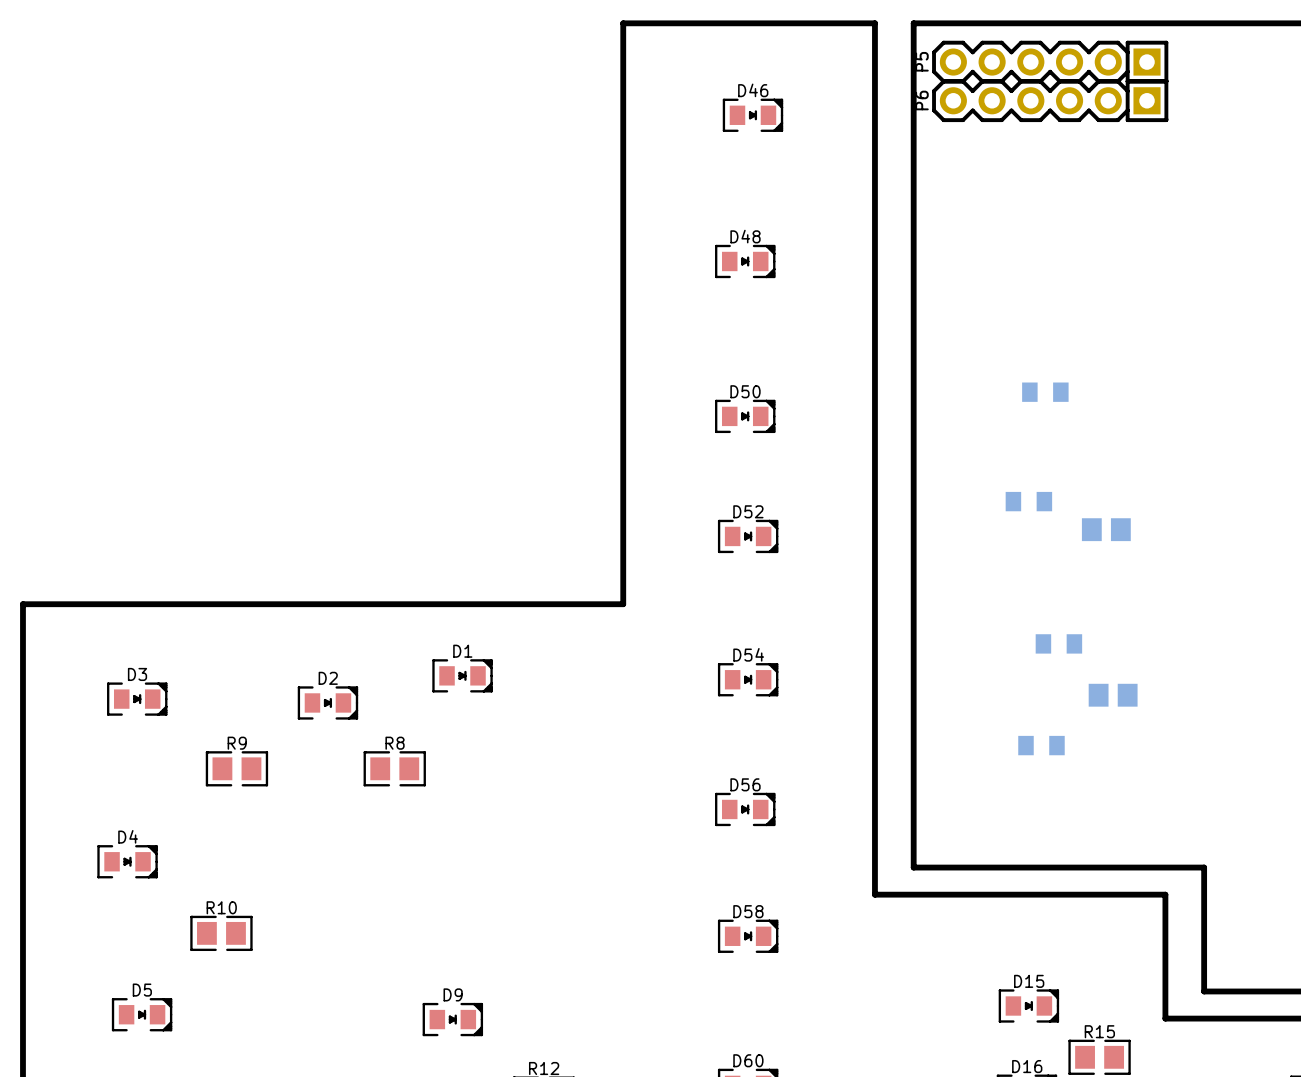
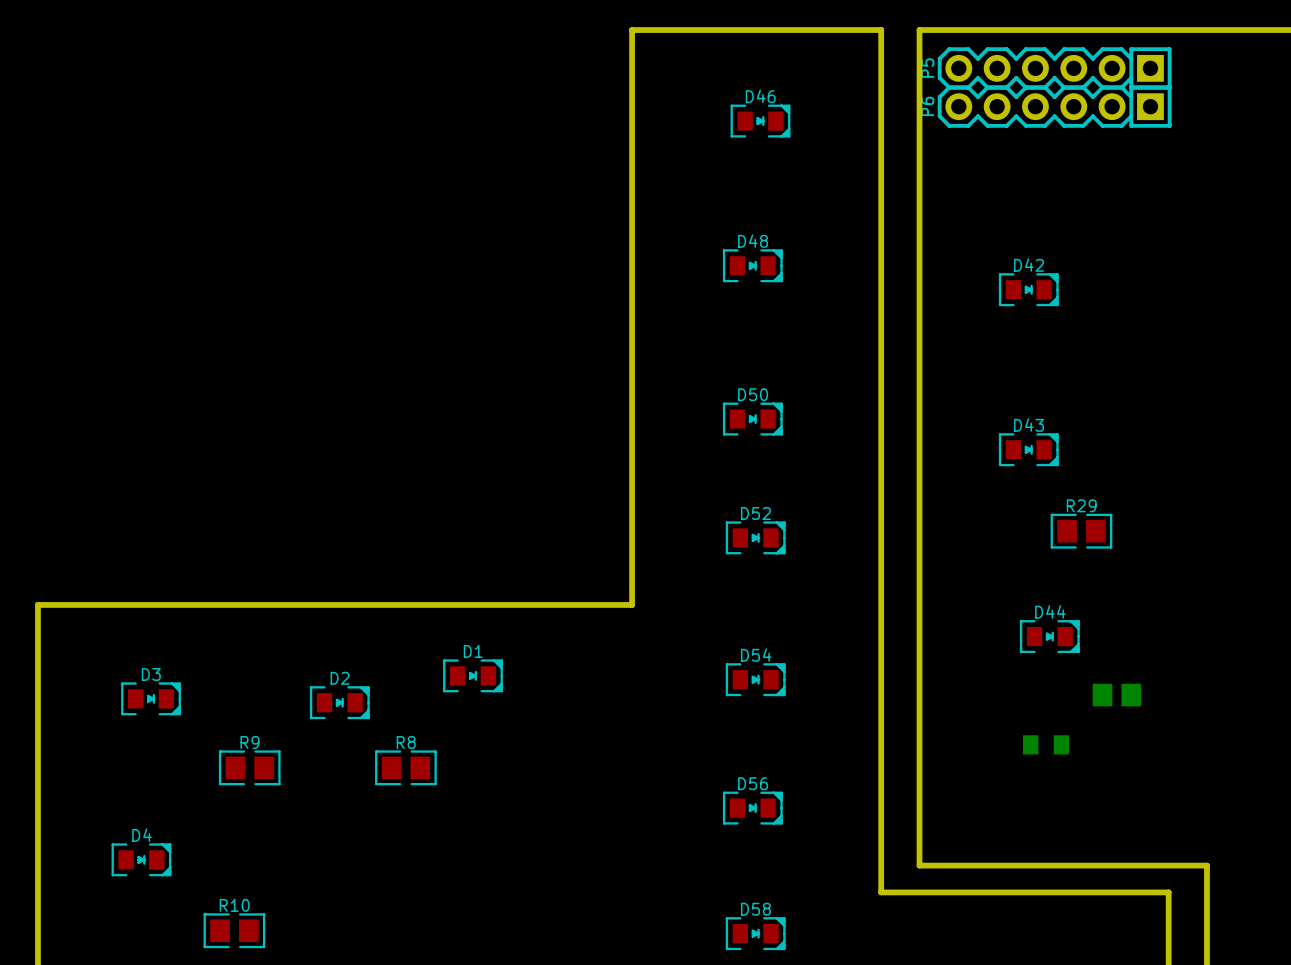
D44 side: bottom (1045, 392) -> top (1049, 636)
D43 side: bottom (1028, 501) -> top (1028, 449)
R29 side: bottom (1106, 529) -> top (1081, 531)
D42 side: bottom (1058, 643) -> top (1028, 289)

